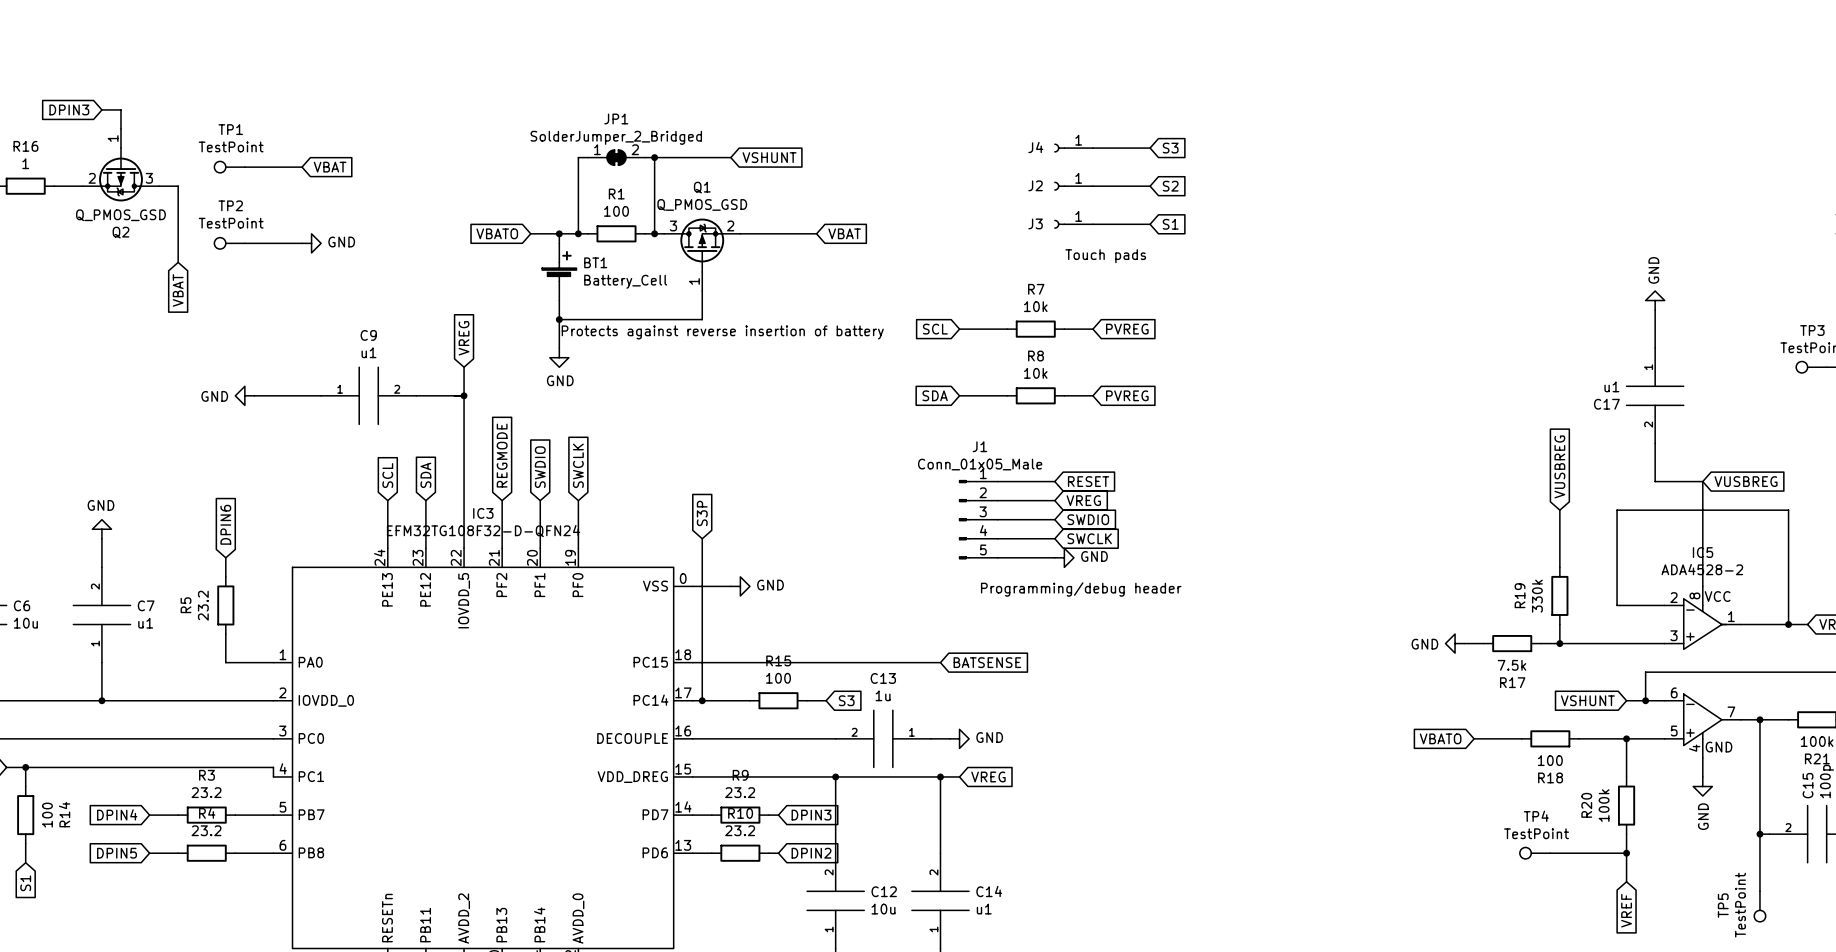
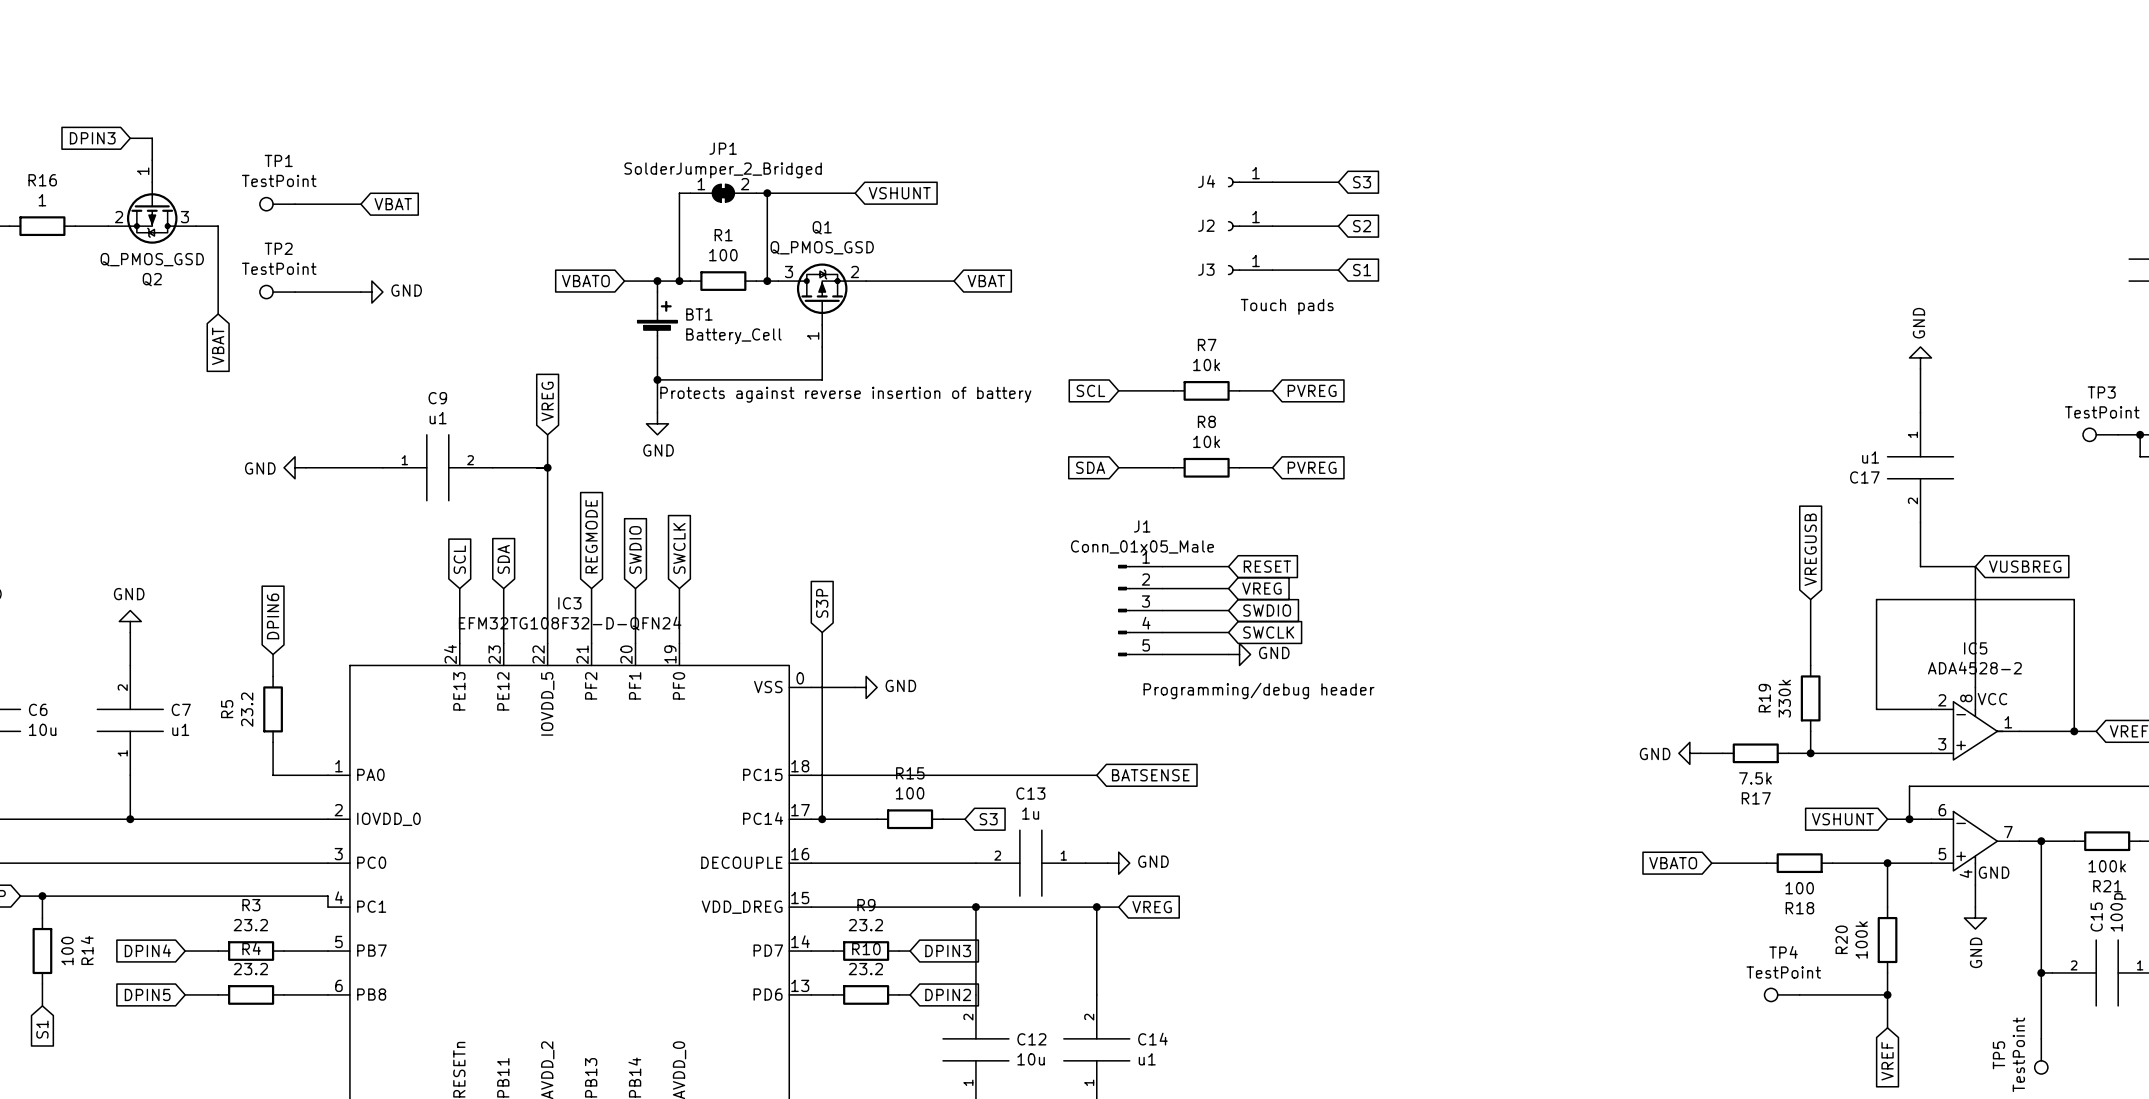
global label: VUSBREG (1559, 466) -> VREGUSB (1810, 549)

